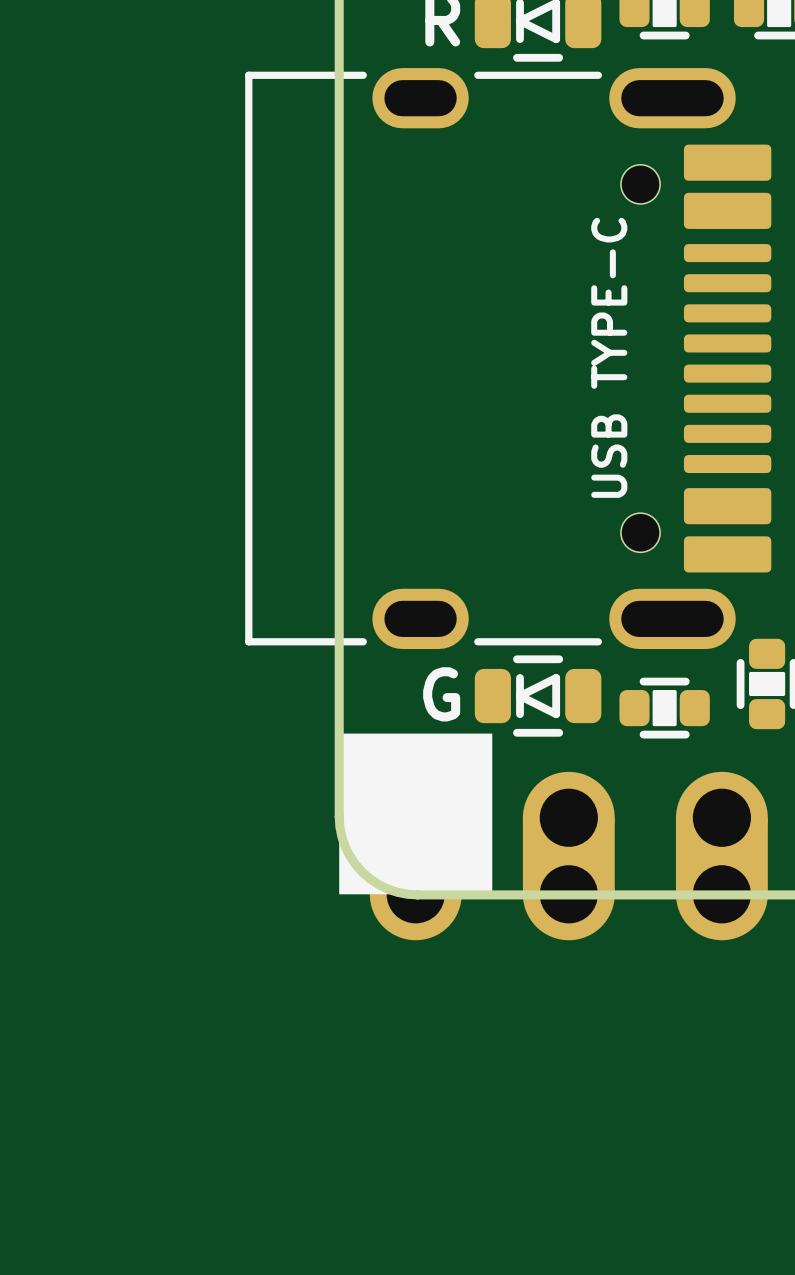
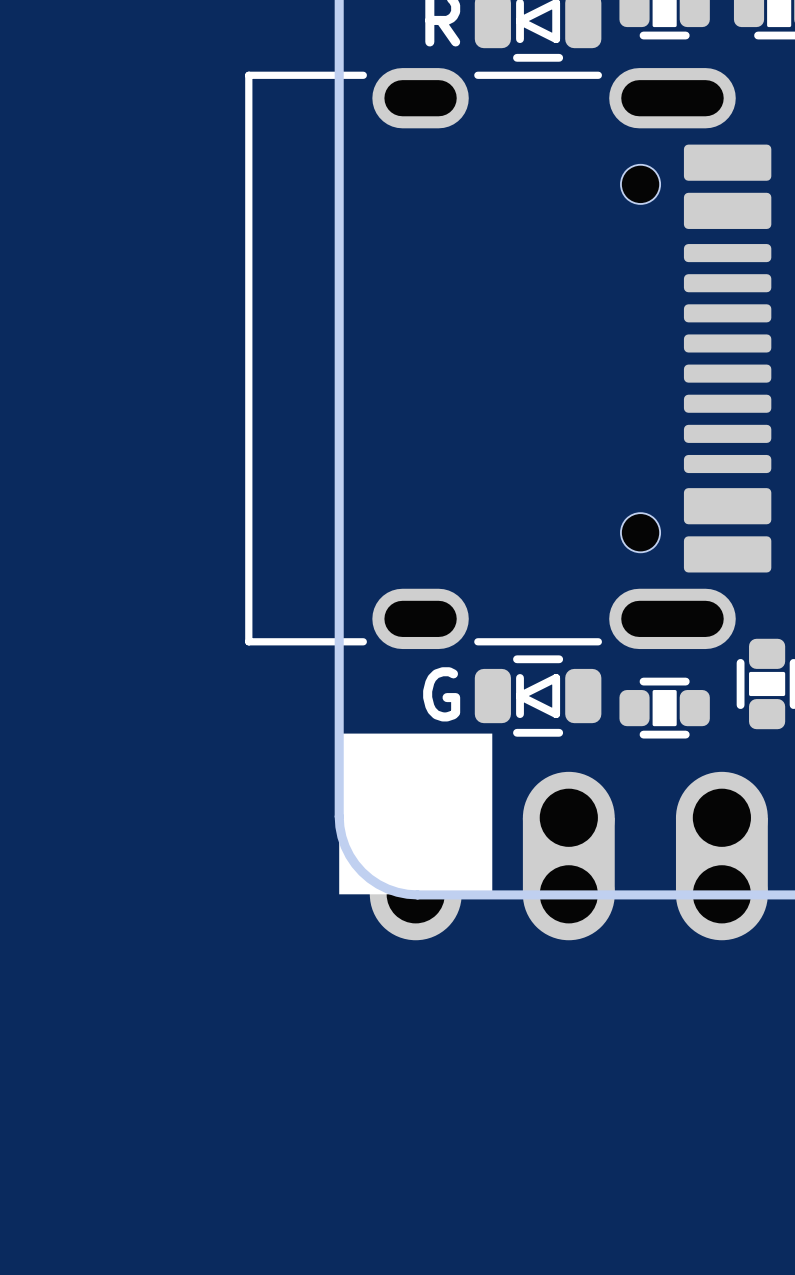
text: USB TYPE-C (609, 357) -> none

